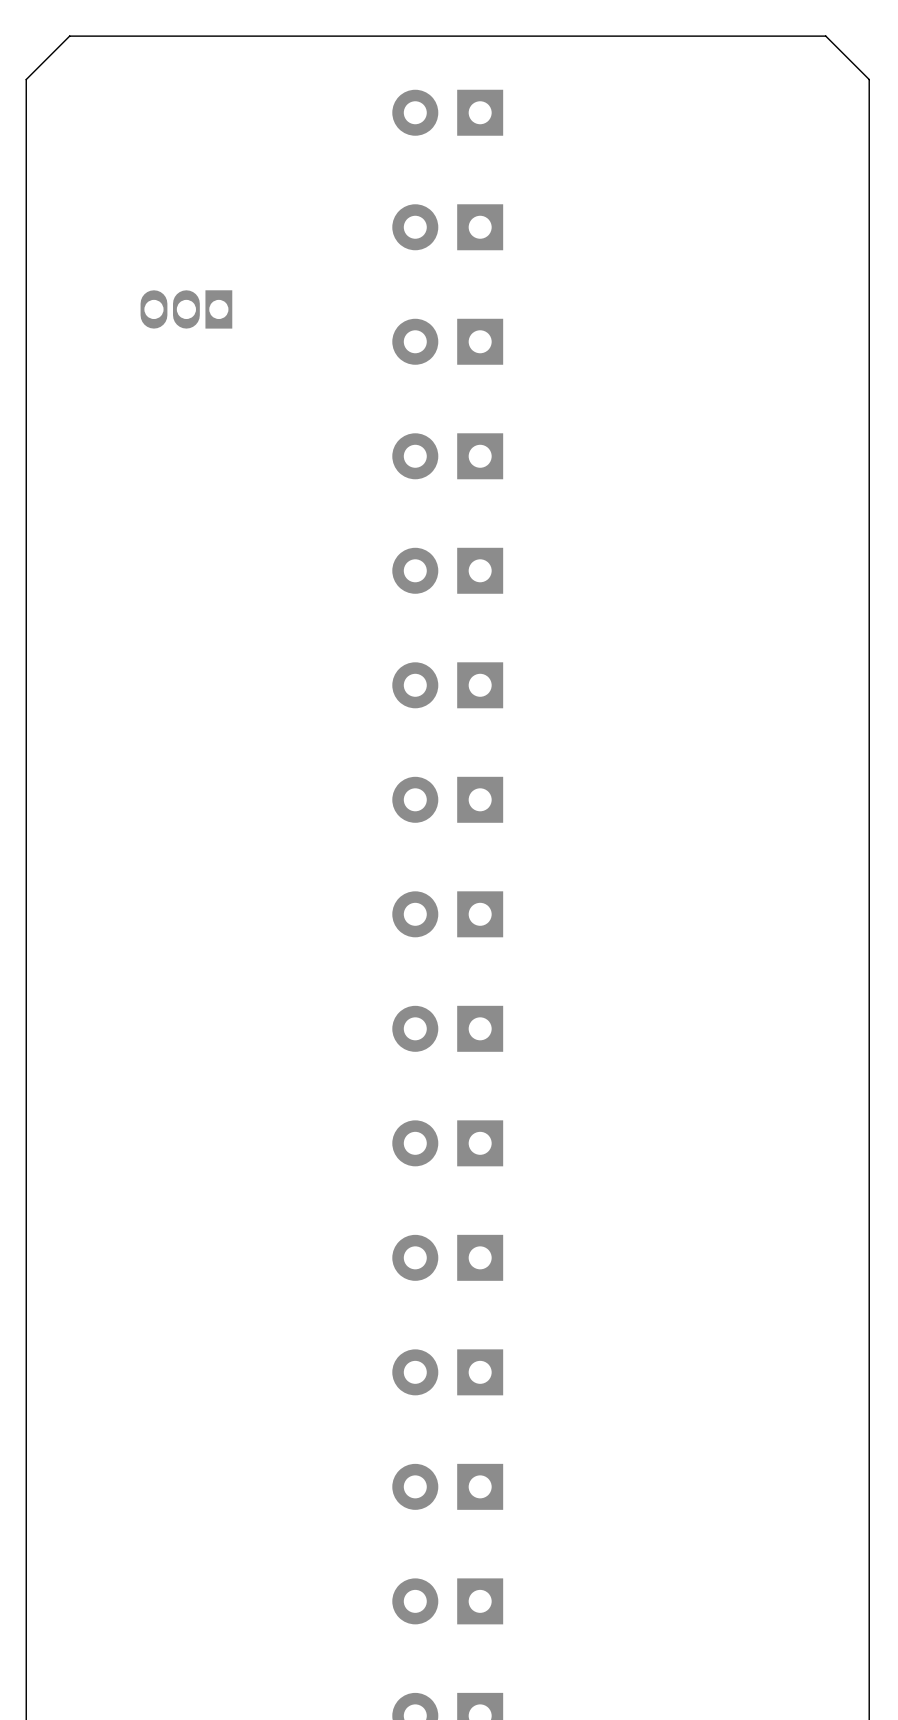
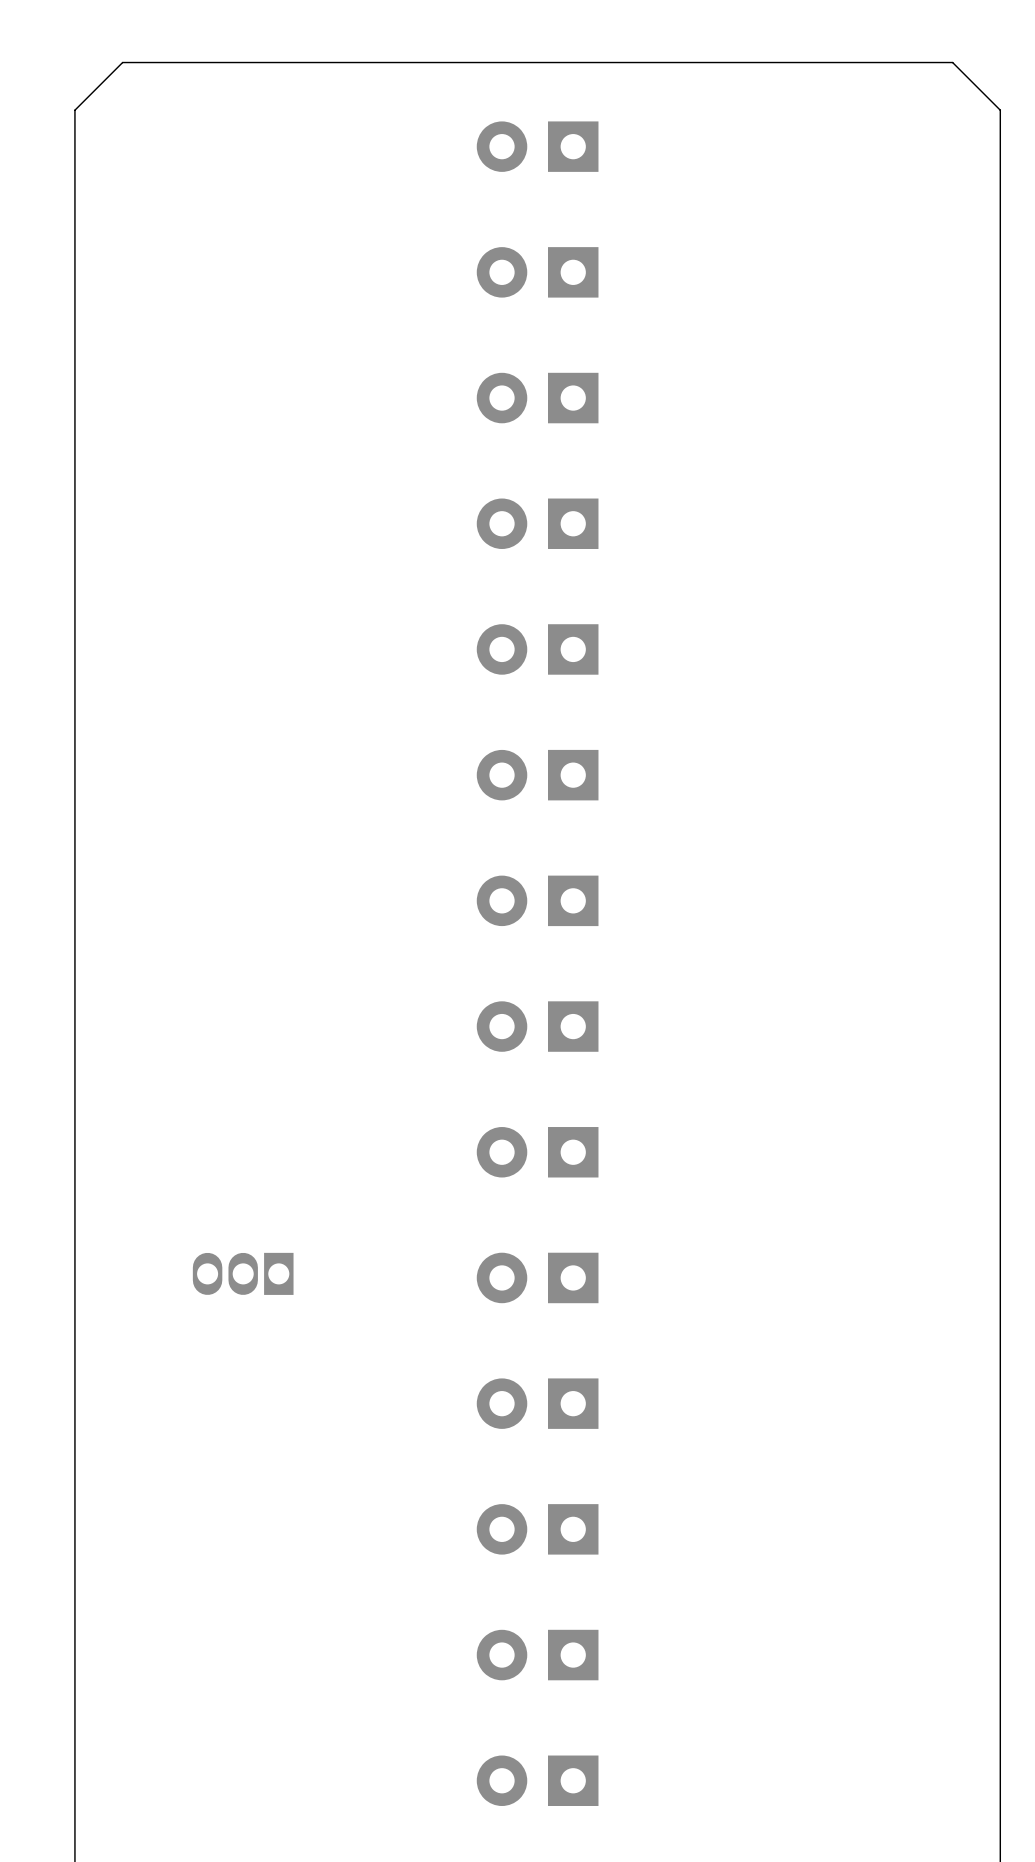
part: (186, 309) -> none
part: none -> (243, 1273)

